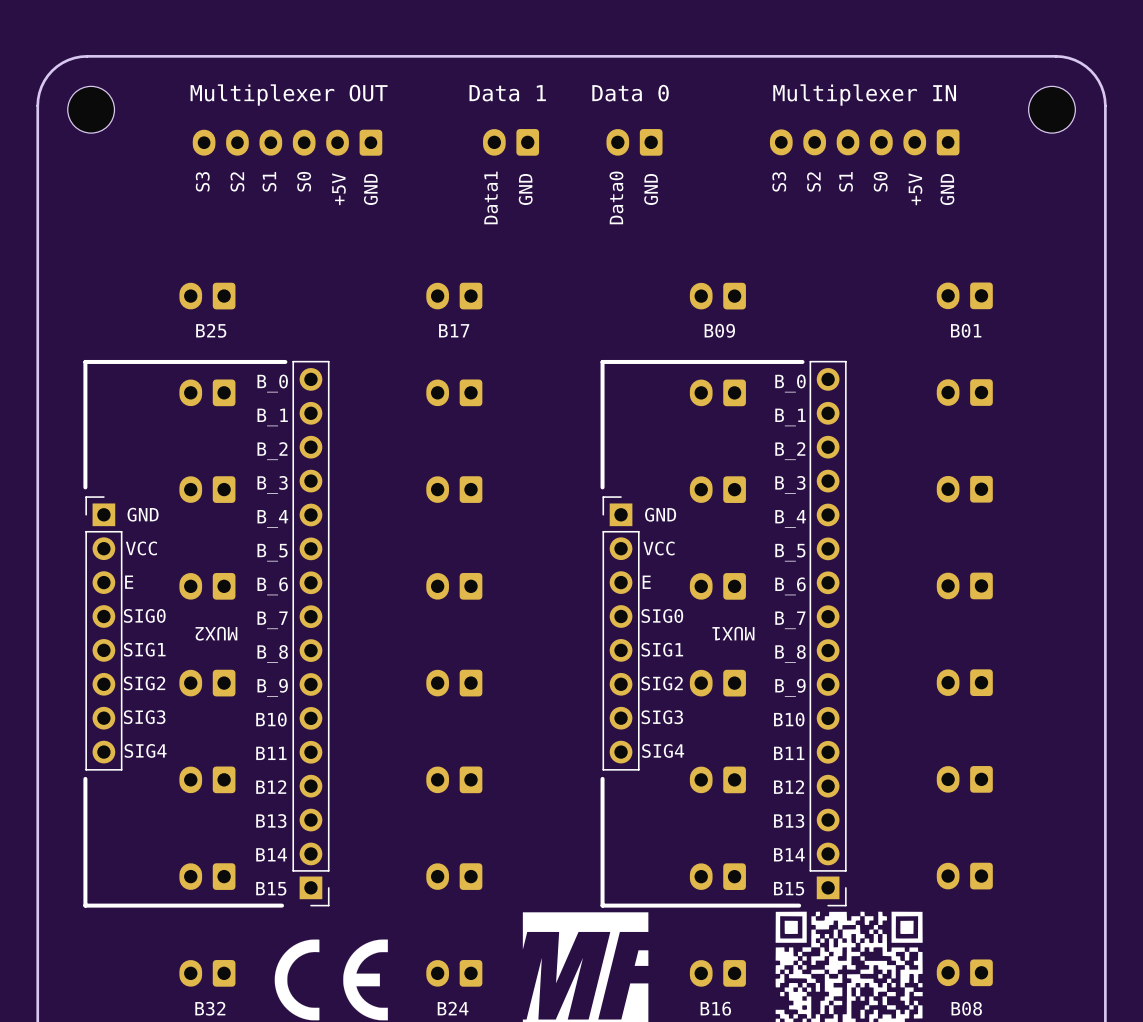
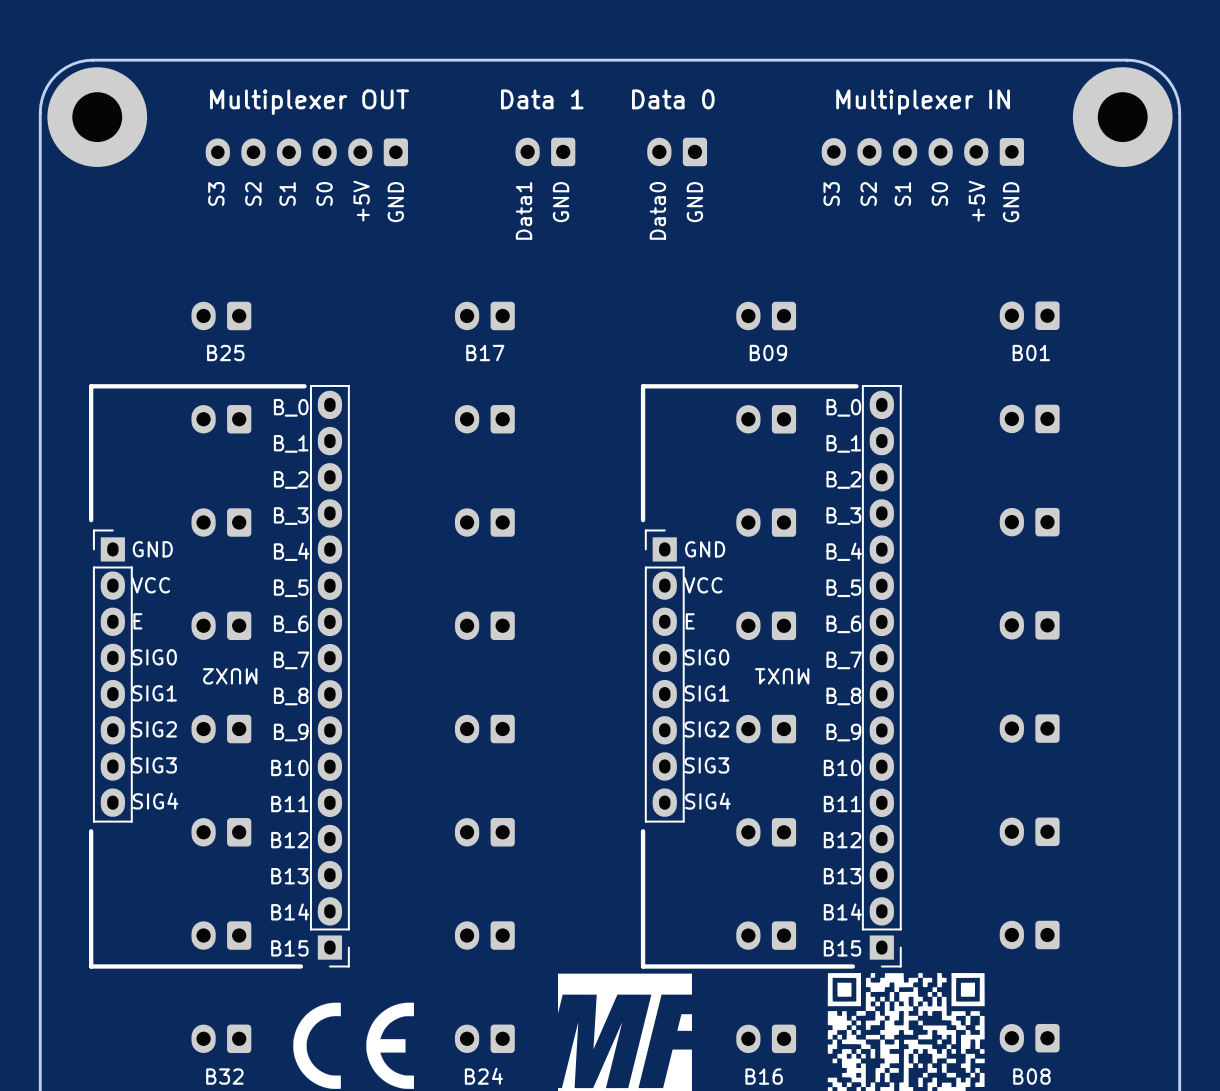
part footprint: [67, 86, 115, 134] -> [47, 67, 148, 167]
part footprint: [1028, 86, 1076, 134] -> [1072, 67, 1173, 167]
MUX2 footprint: [83, 359, 330, 908] -> [89, 384, 350, 969]
MUX1 footprint: [600, 359, 847, 908] -> [640, 384, 902, 969]

